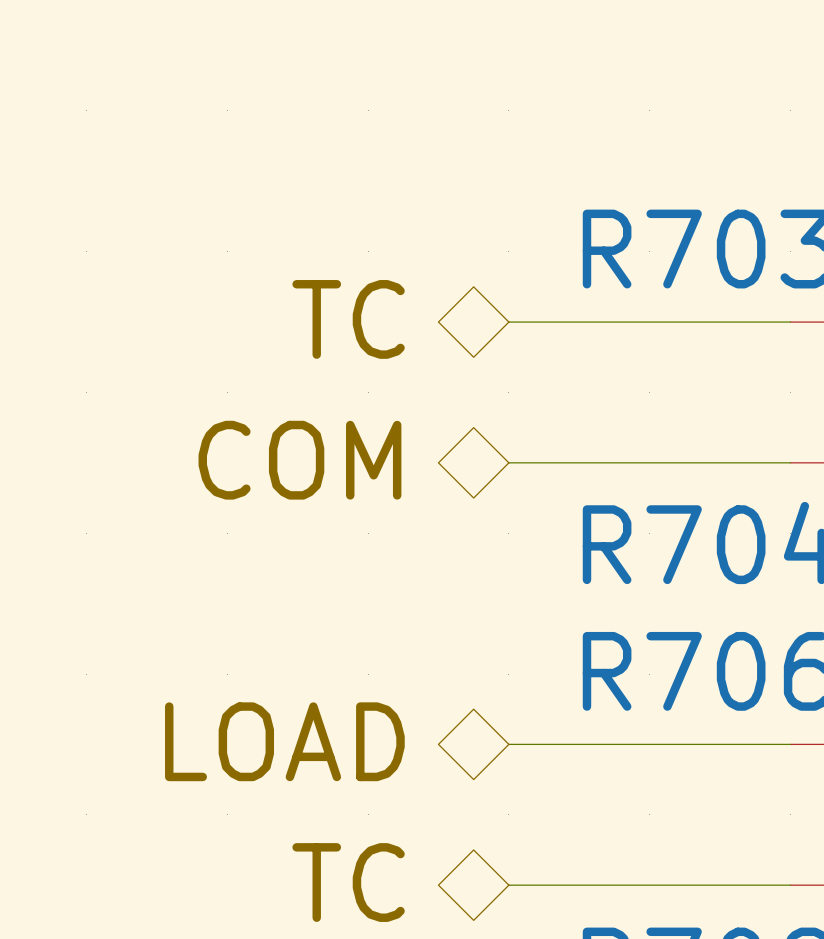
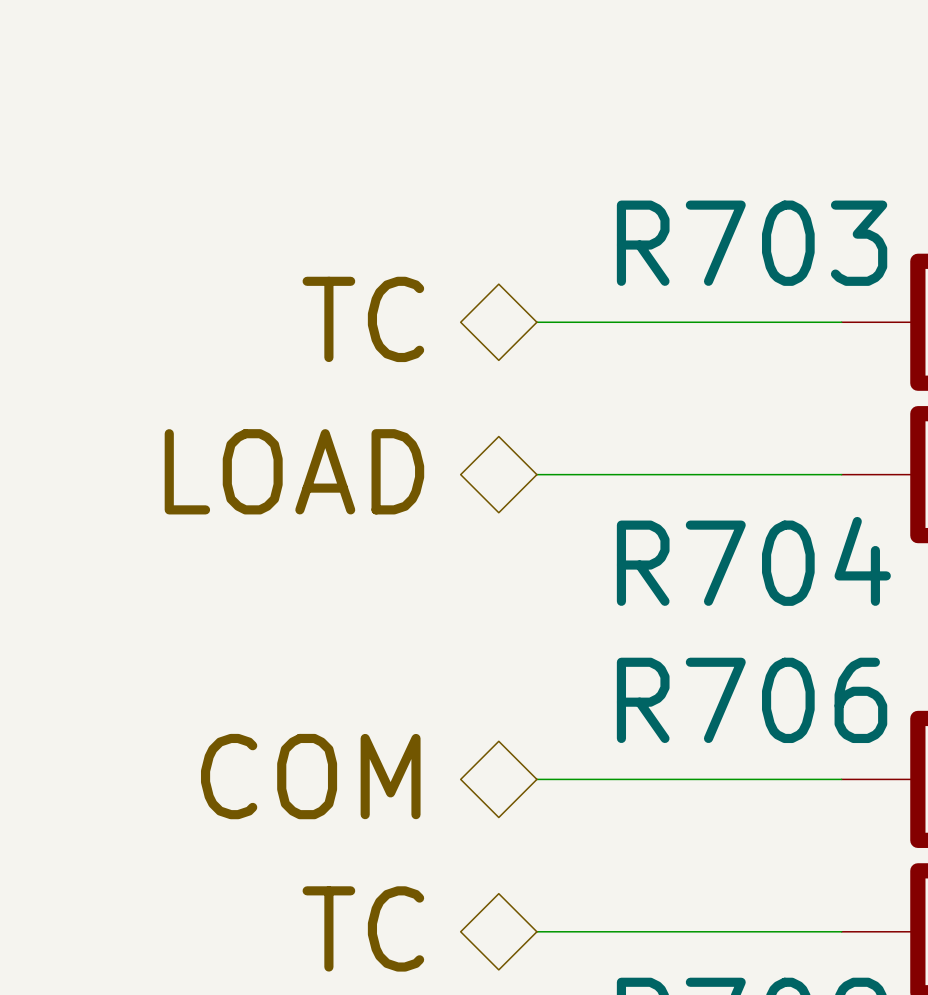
hierarchical label: COM (299, 460) -> LOAD (294, 471)
hierarchical label: LOAD (284, 741) -> COM (310, 776)

